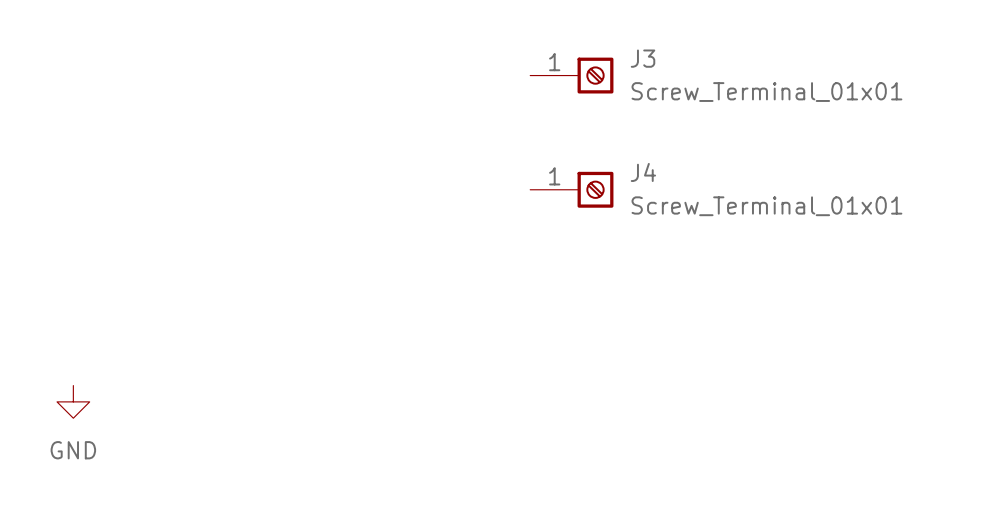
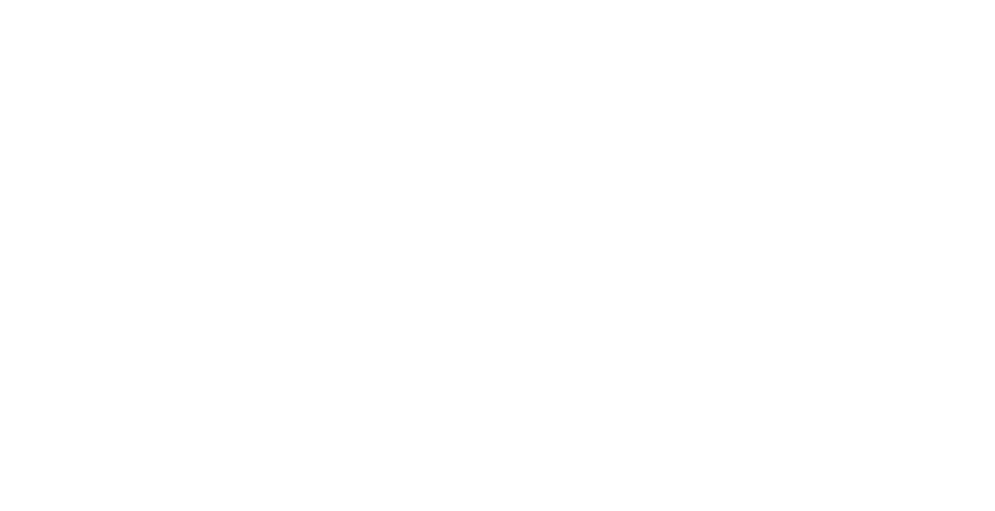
J3: Screw_Terminal_01x01 (571, 75) -> none
J4: Screw_Terminal_01x01 (571, 189) -> none
power symbol: GND (73, 401) -> none

